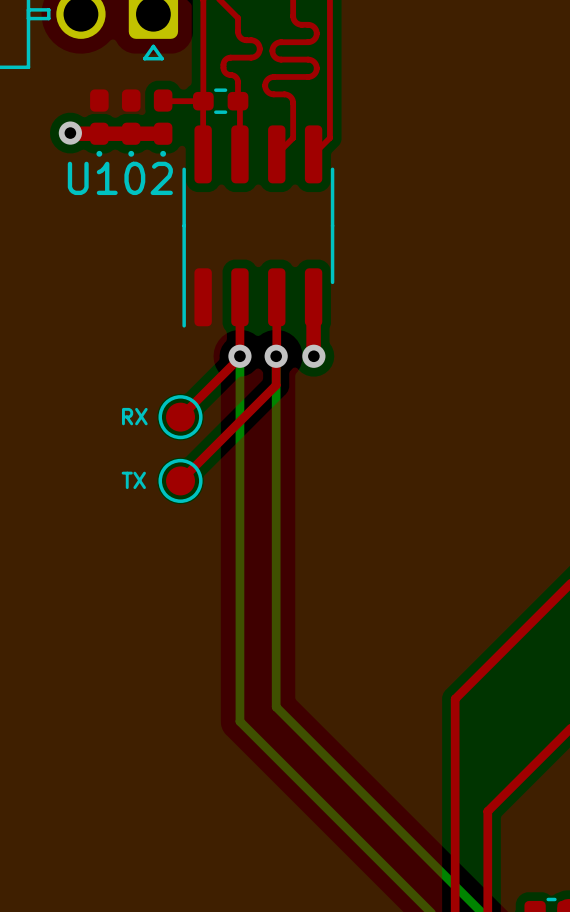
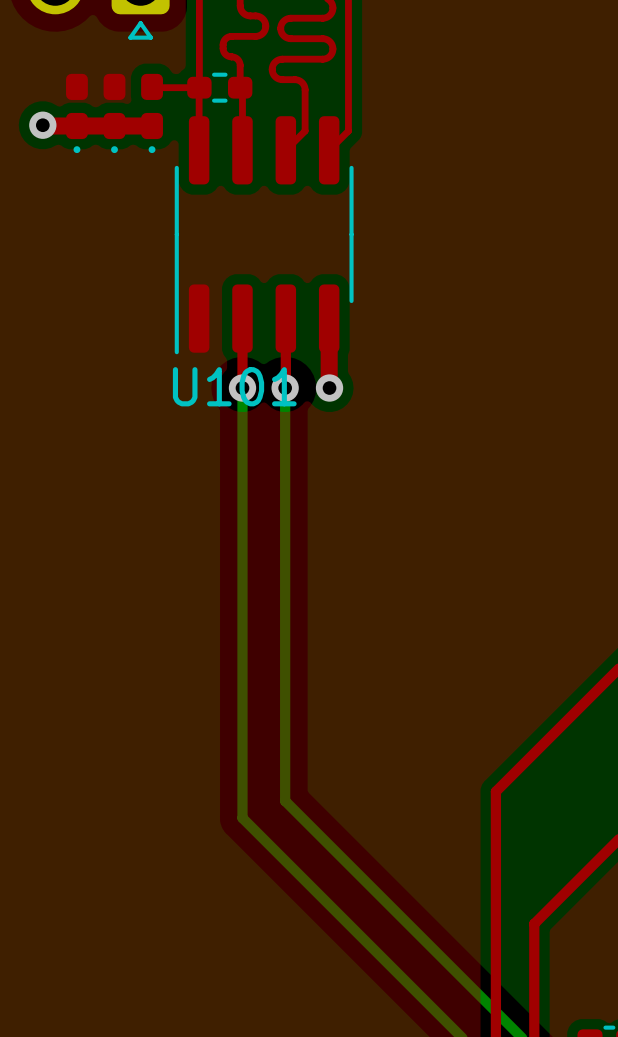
U102 name: U102 (120, 178) -> U101 (234, 386)
top track: (239, 356) (180, 417) -> none
top track: (276, 356) (276, 385) (180, 480) -> none
RX: (180, 417) -> none
TX: (180, 480) -> none

